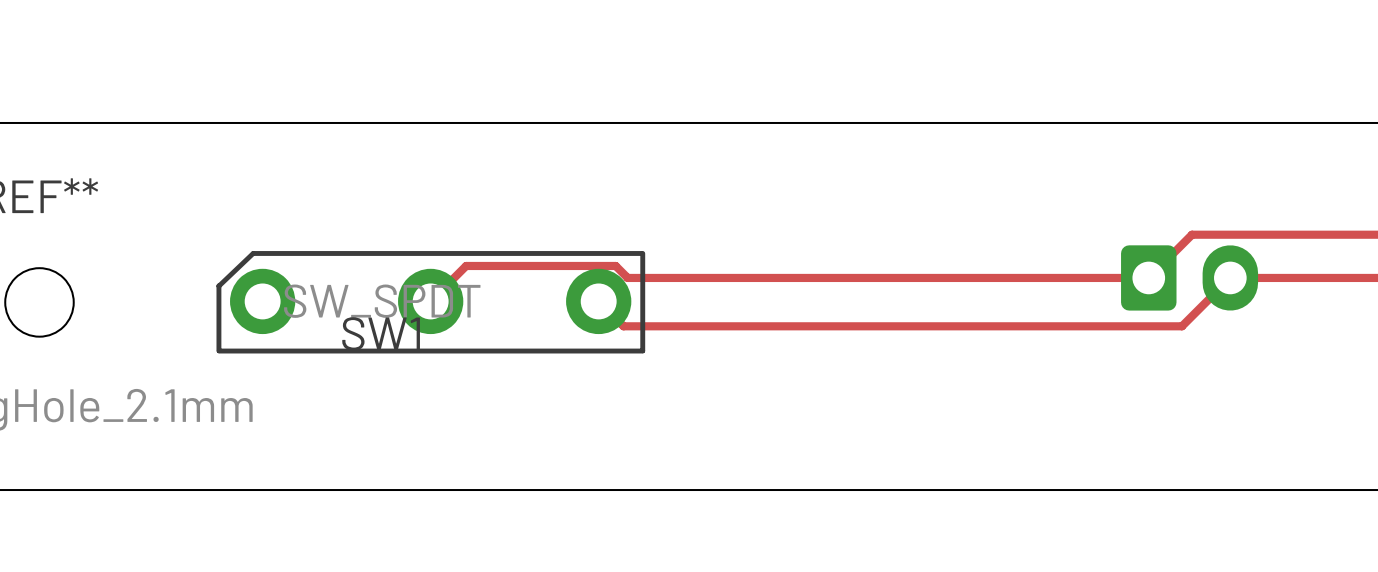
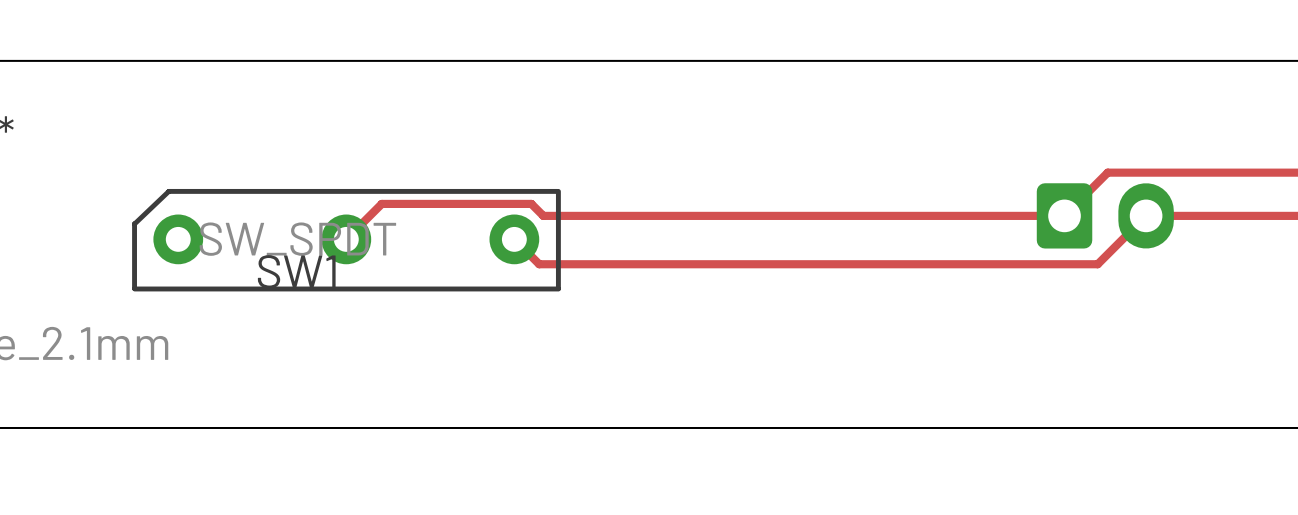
SW1 footprint: [216, 251, 646, 354] -> [132, 188, 561, 292]

